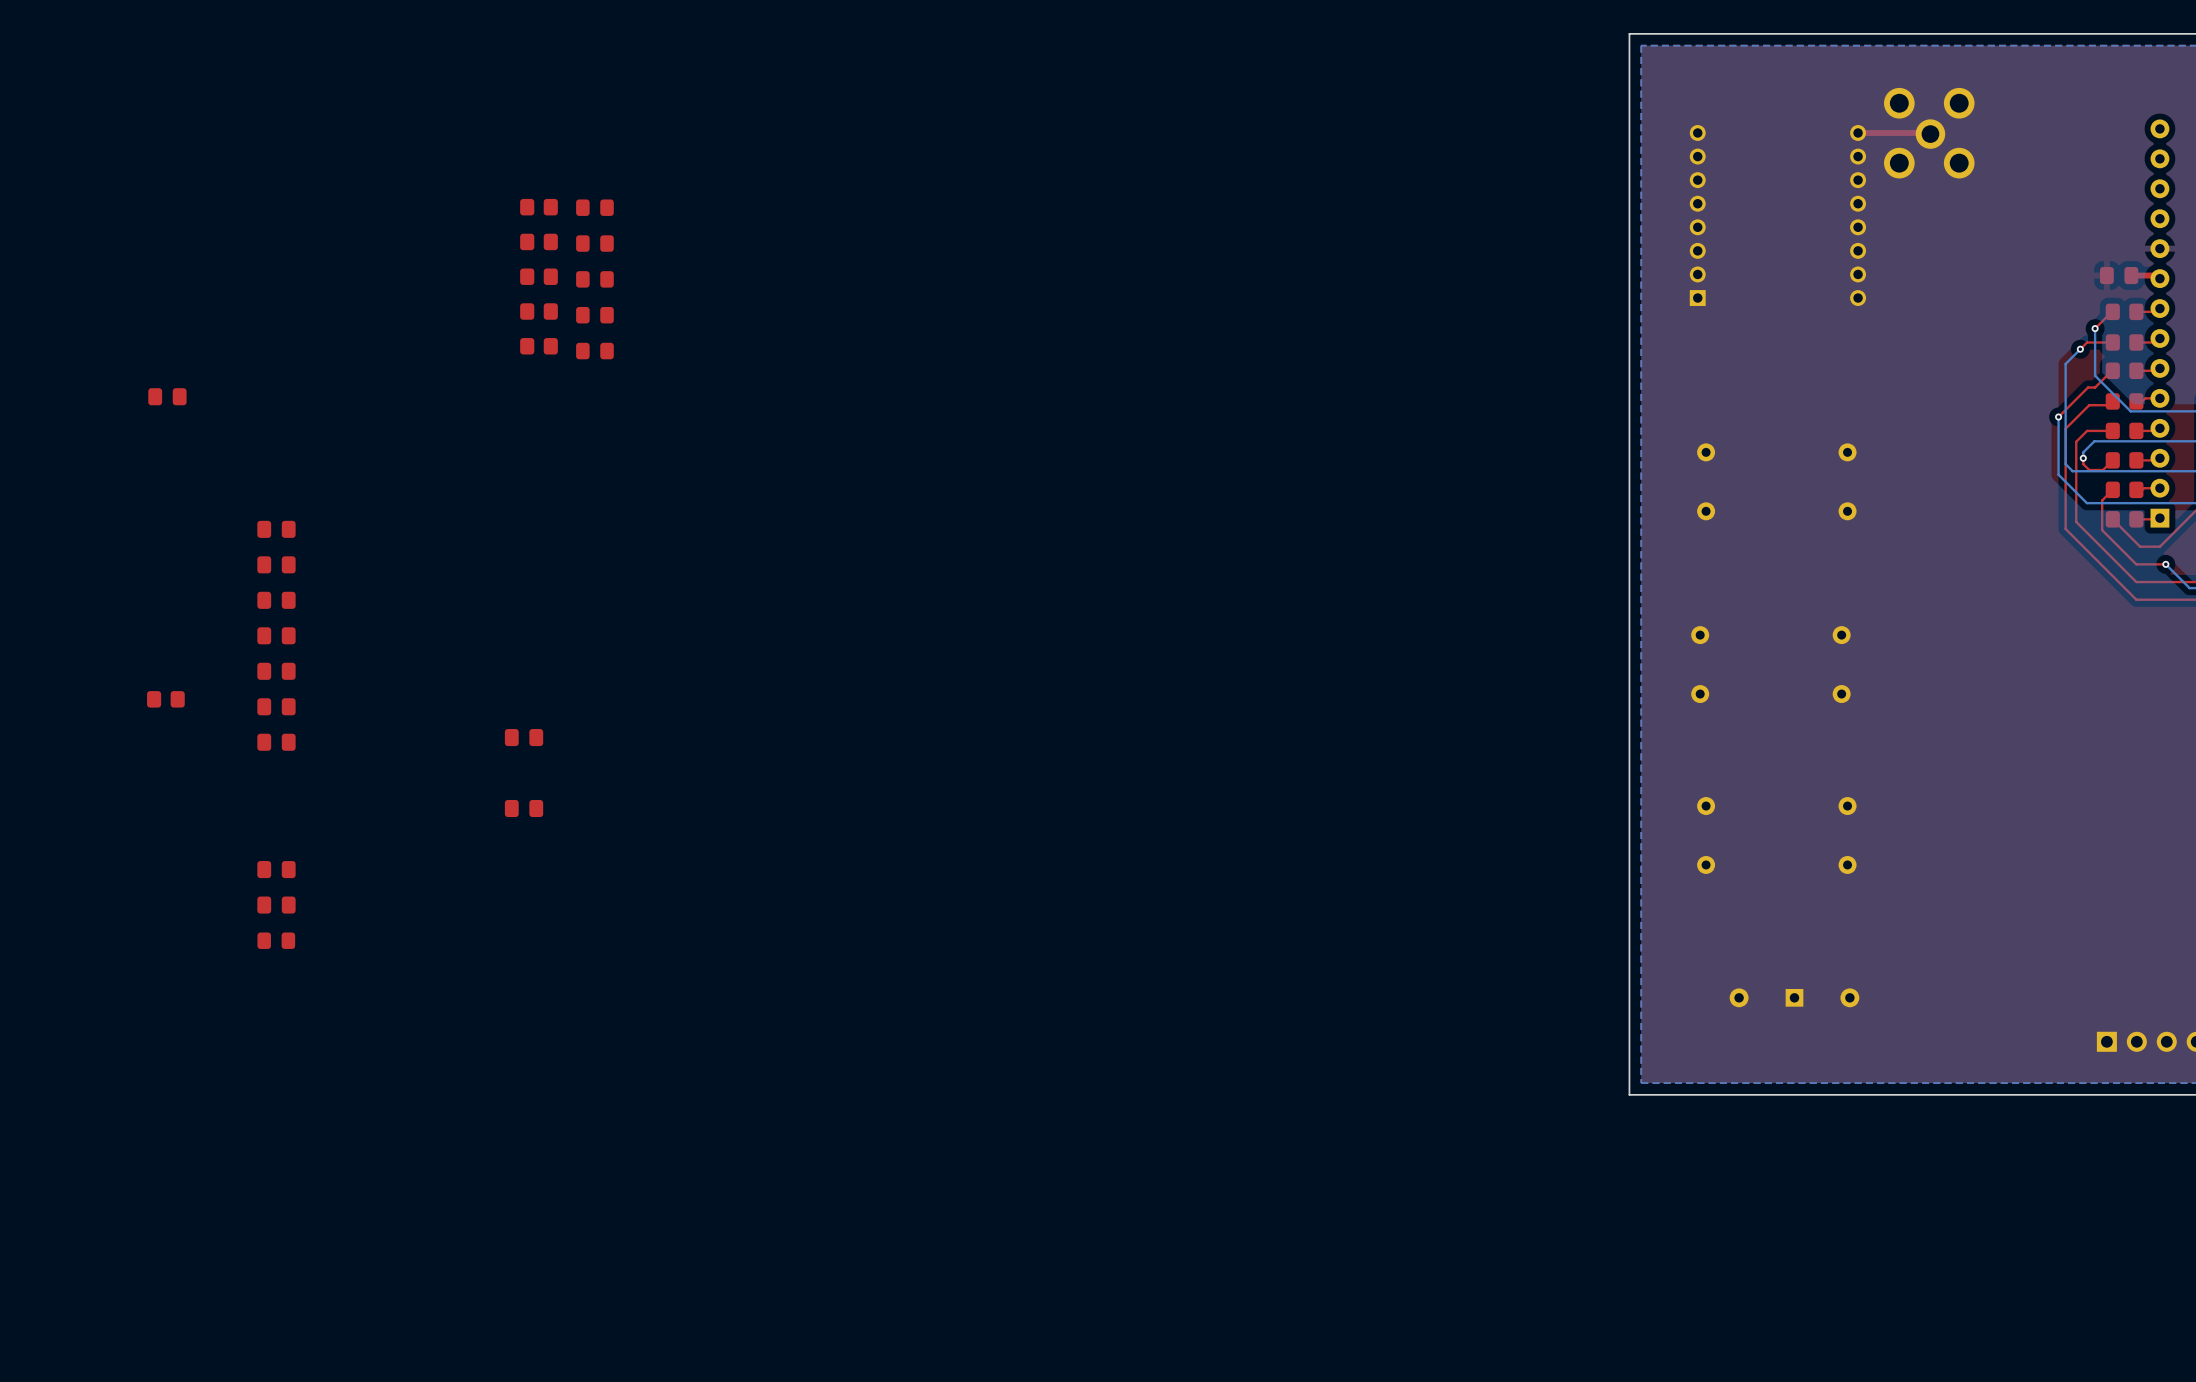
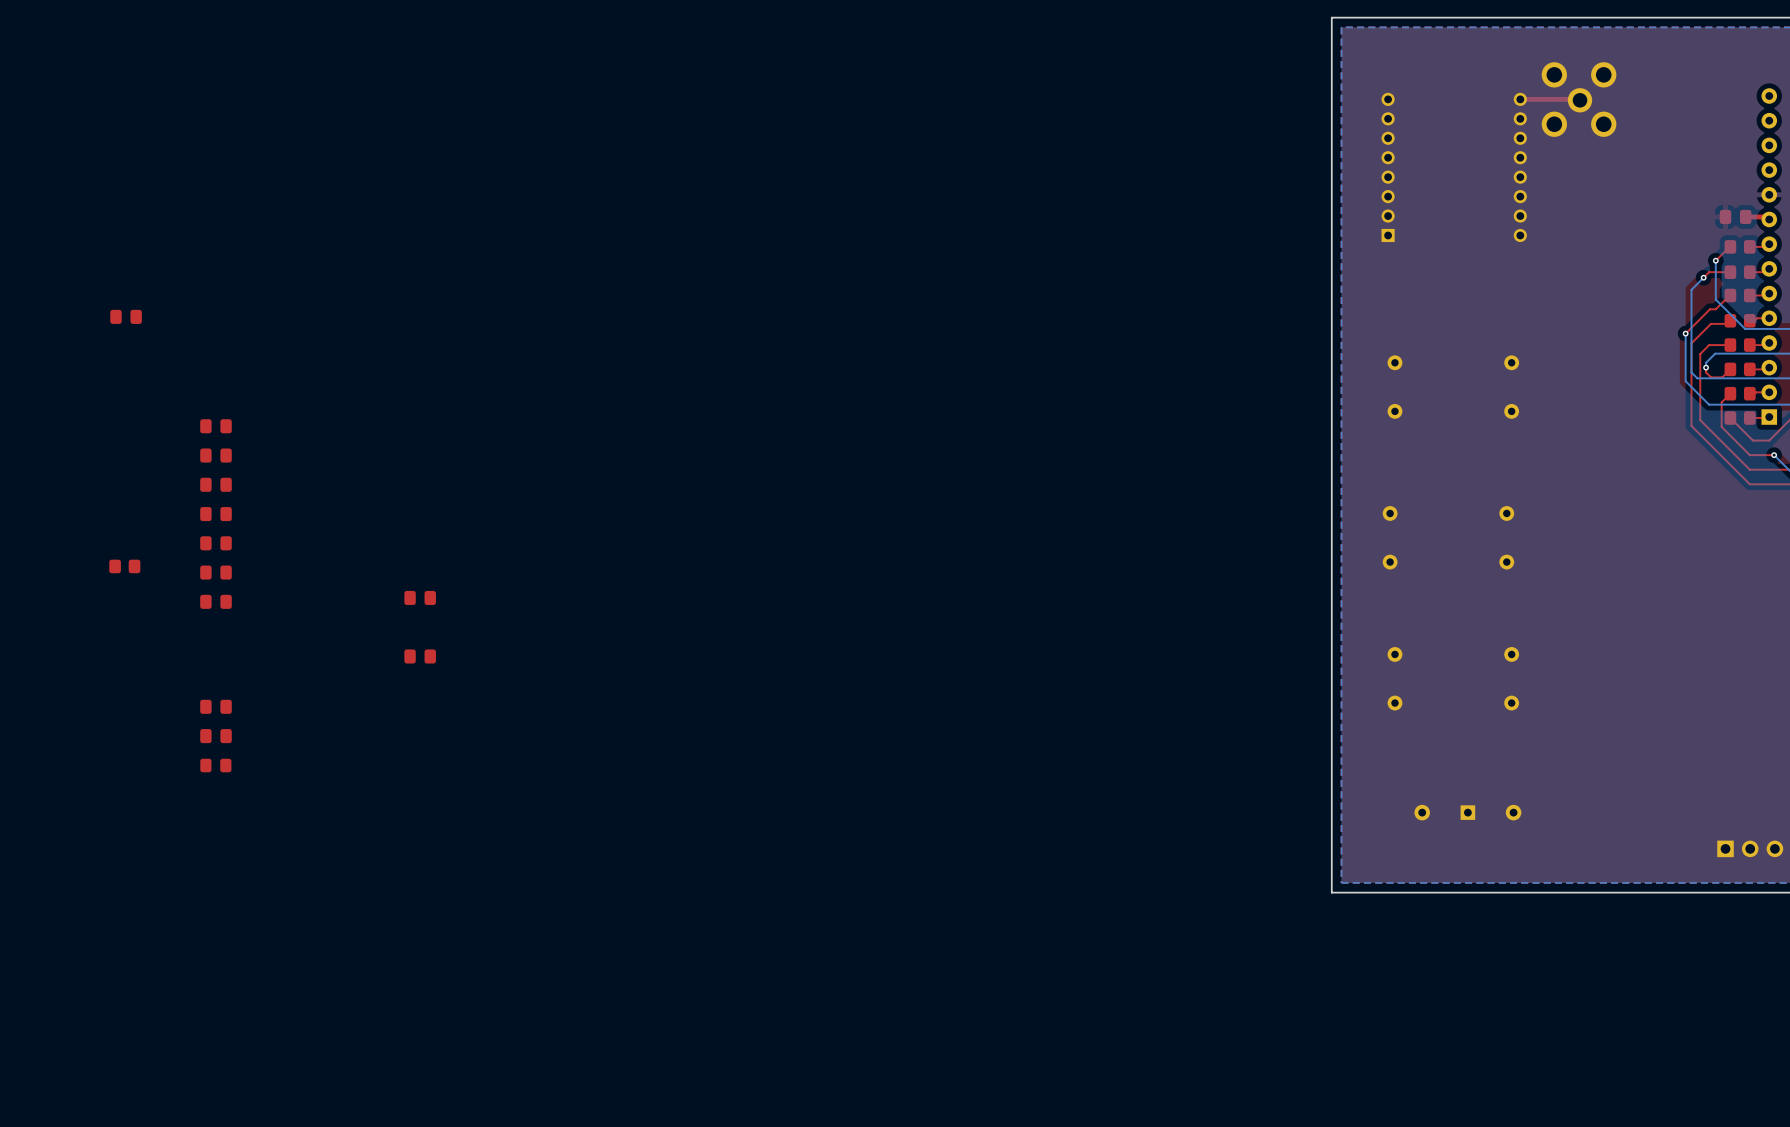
part: (539, 207) -> none
part: (594, 207) -> none
part: (539, 241) -> none
part: (594, 243) -> none
part: (539, 276) -> none
part: (594, 279) -> none
part: (539, 311) -> none
part: (594, 315) -> none
part: (539, 346) -> none
part: (594, 351) -> none

